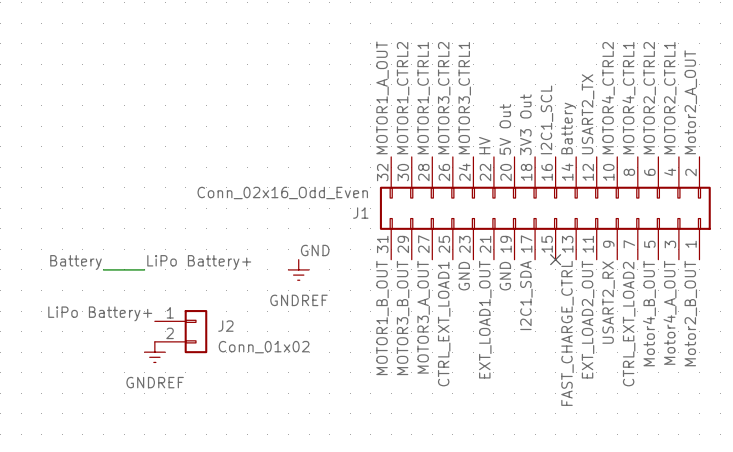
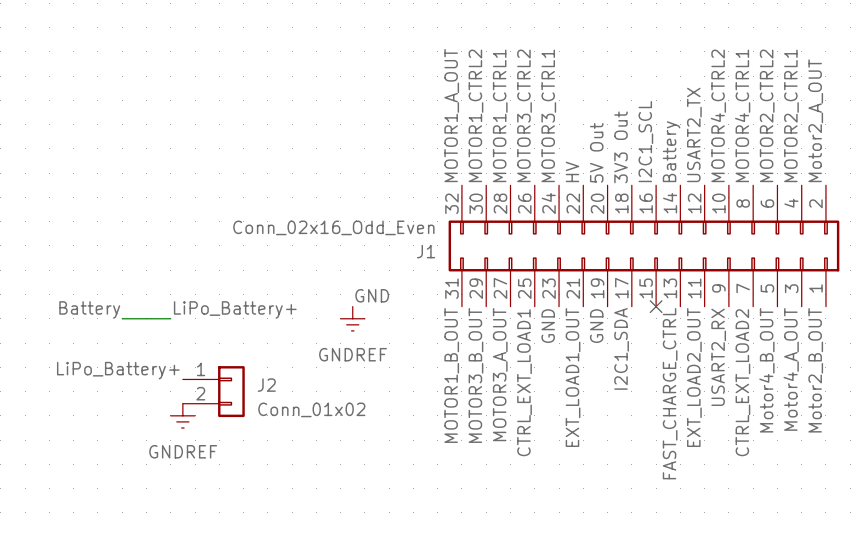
label: LiPo Battery+ (199, 262) -> LiPo_Battery+ (235, 309)
label: LiPo Battery+ (100, 313) -> LiPo_Battery+ (118, 370)

